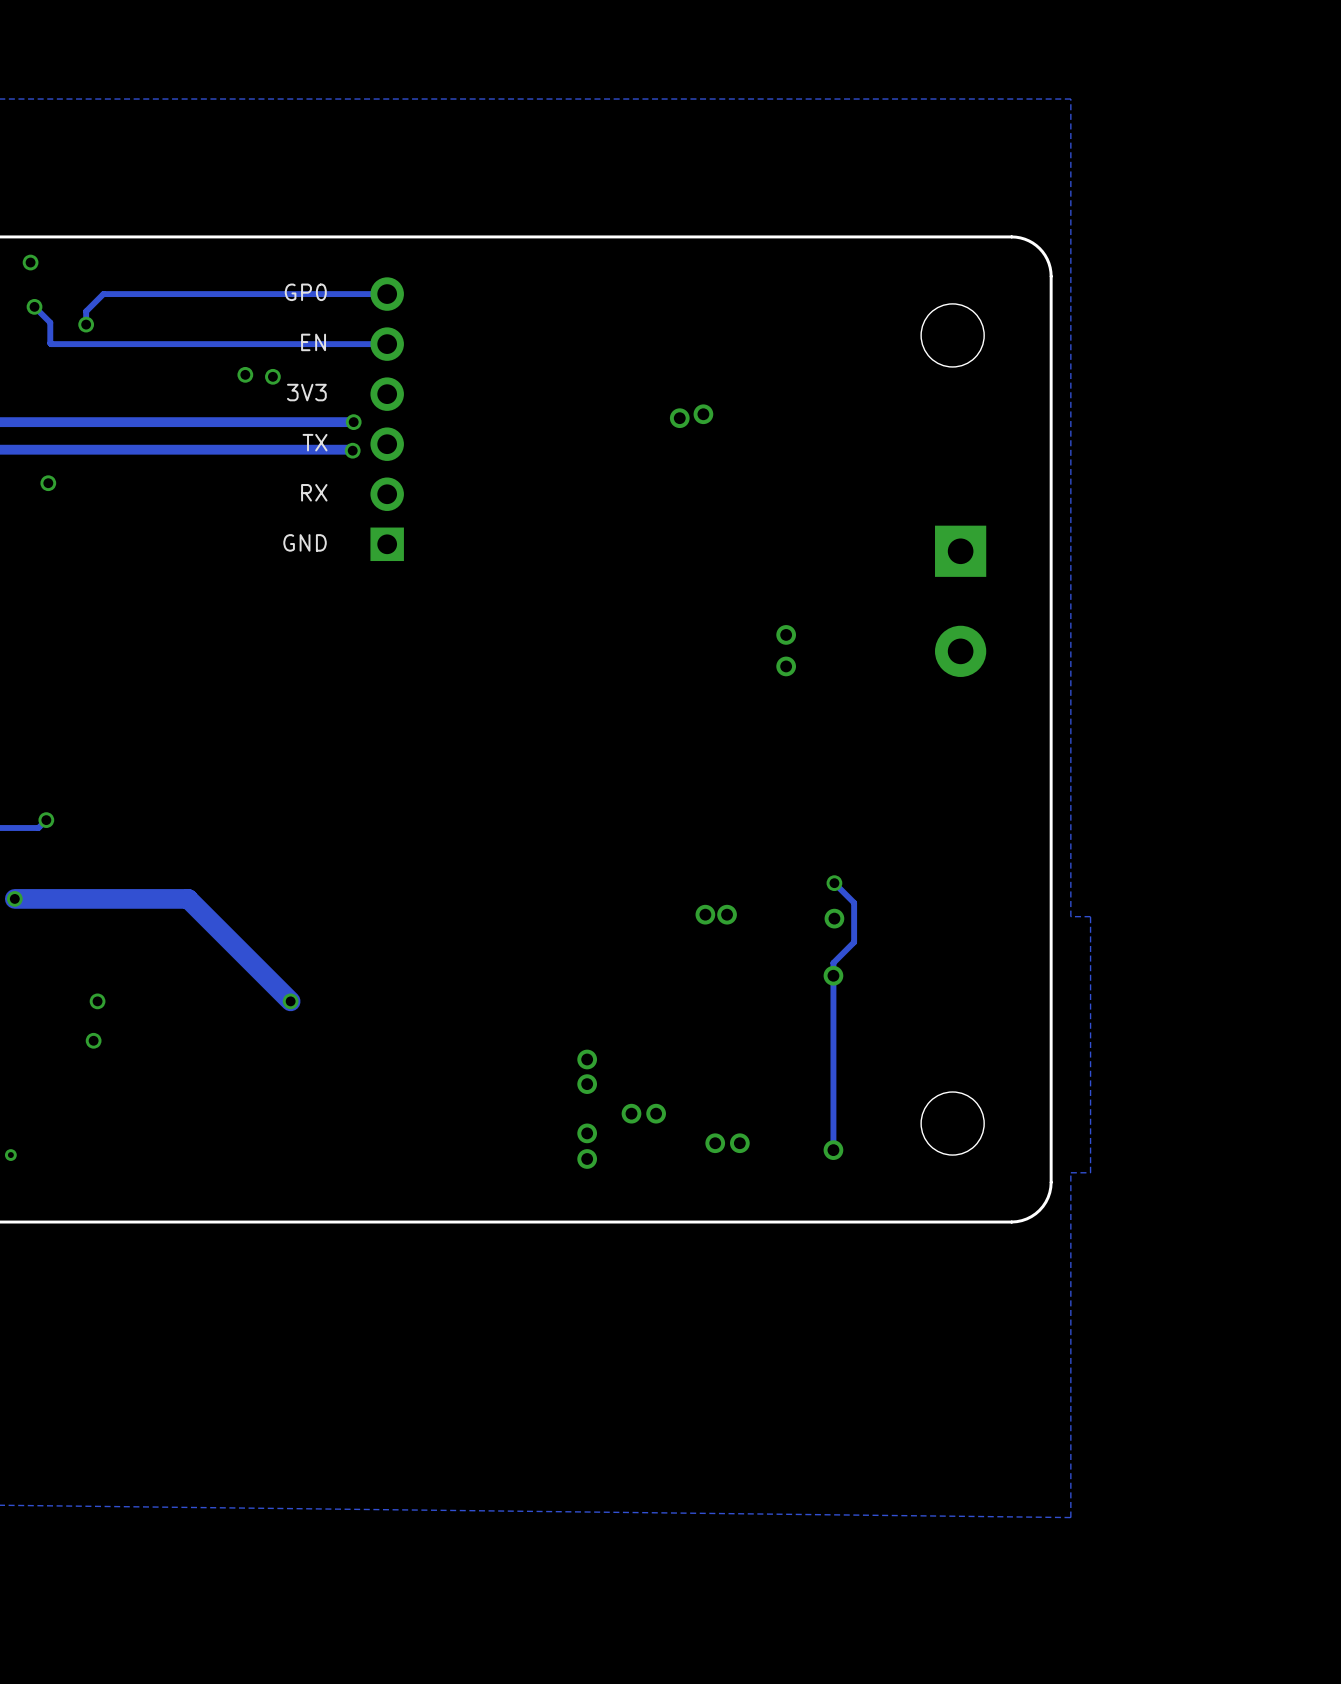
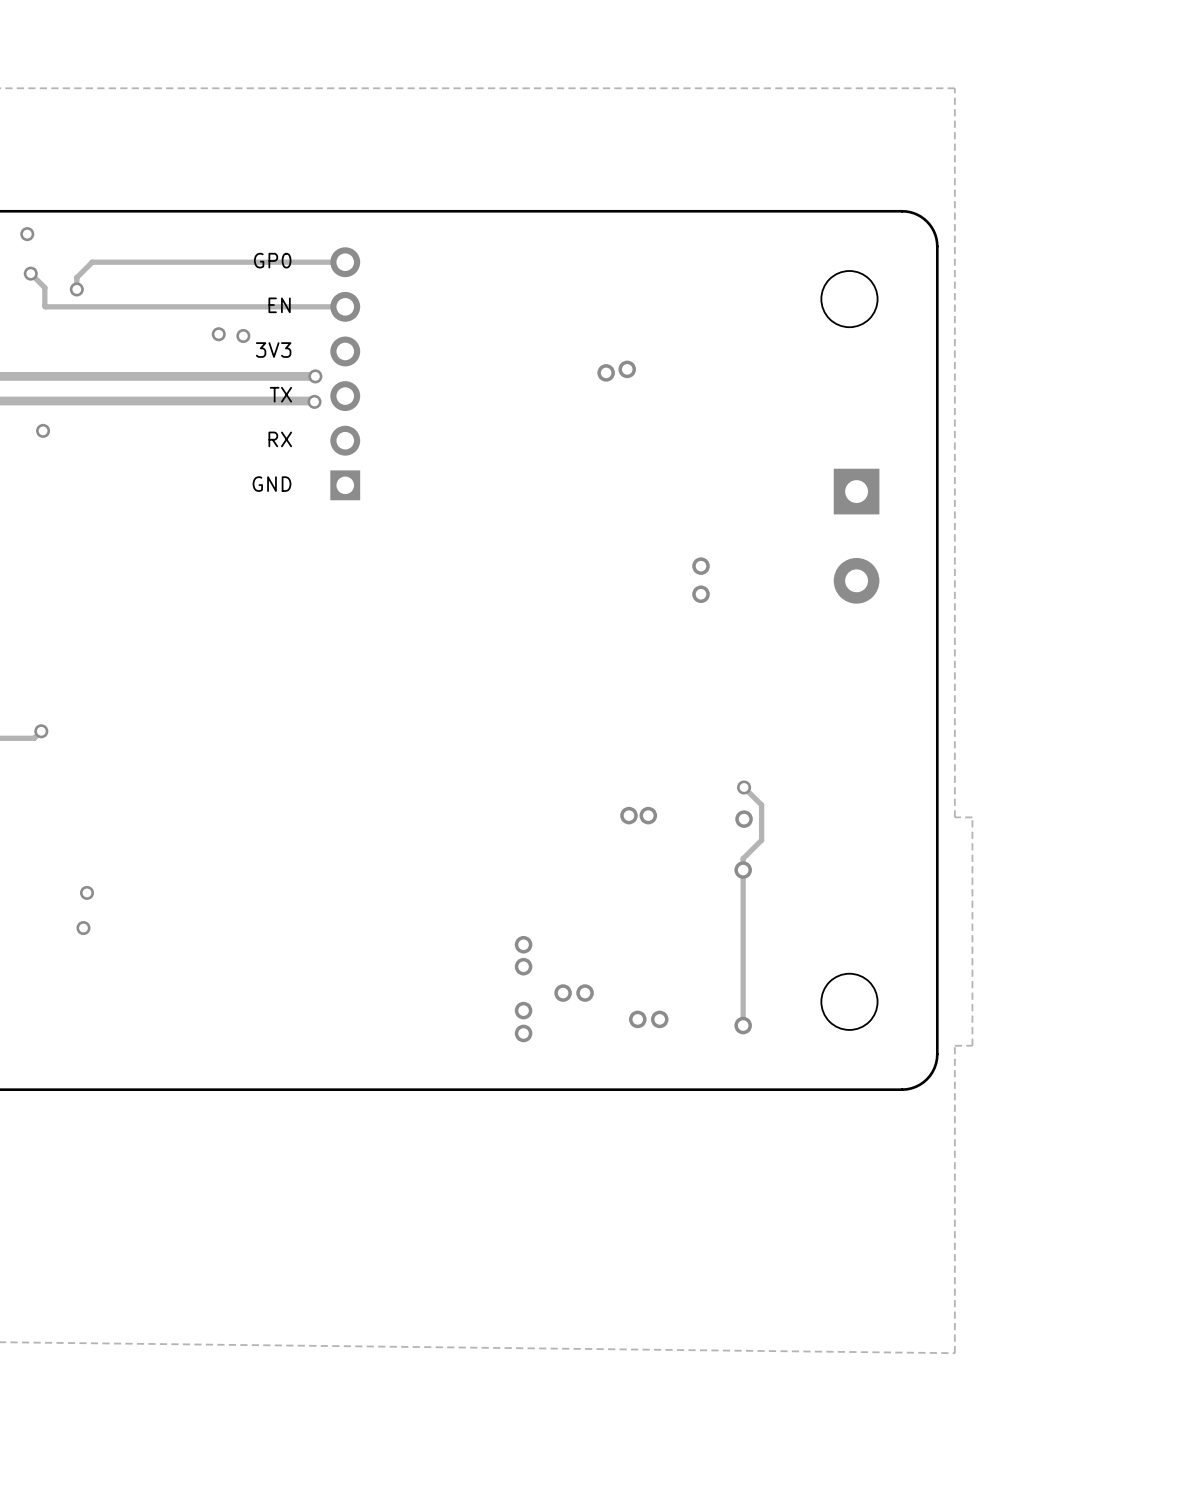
track: (14, 898) (188, 898) (290, 1001) -> none
via: (14, 898) -> none
via: (290, 1001) -> none
via: (10, 1155) -> none

